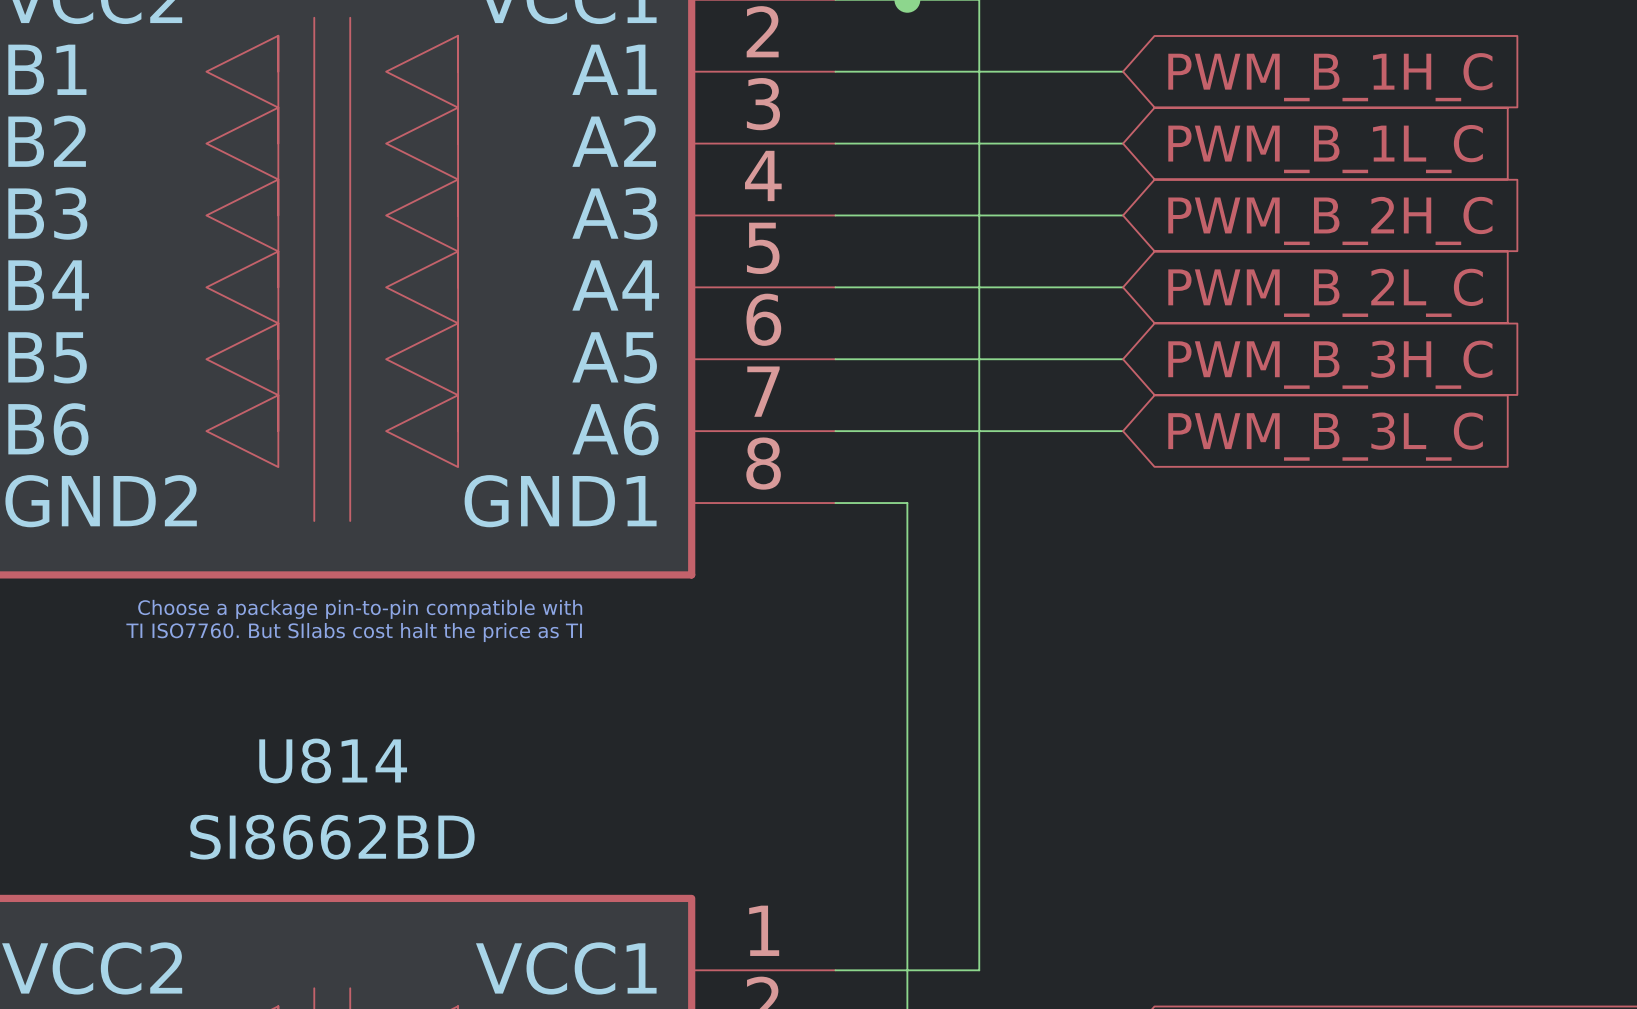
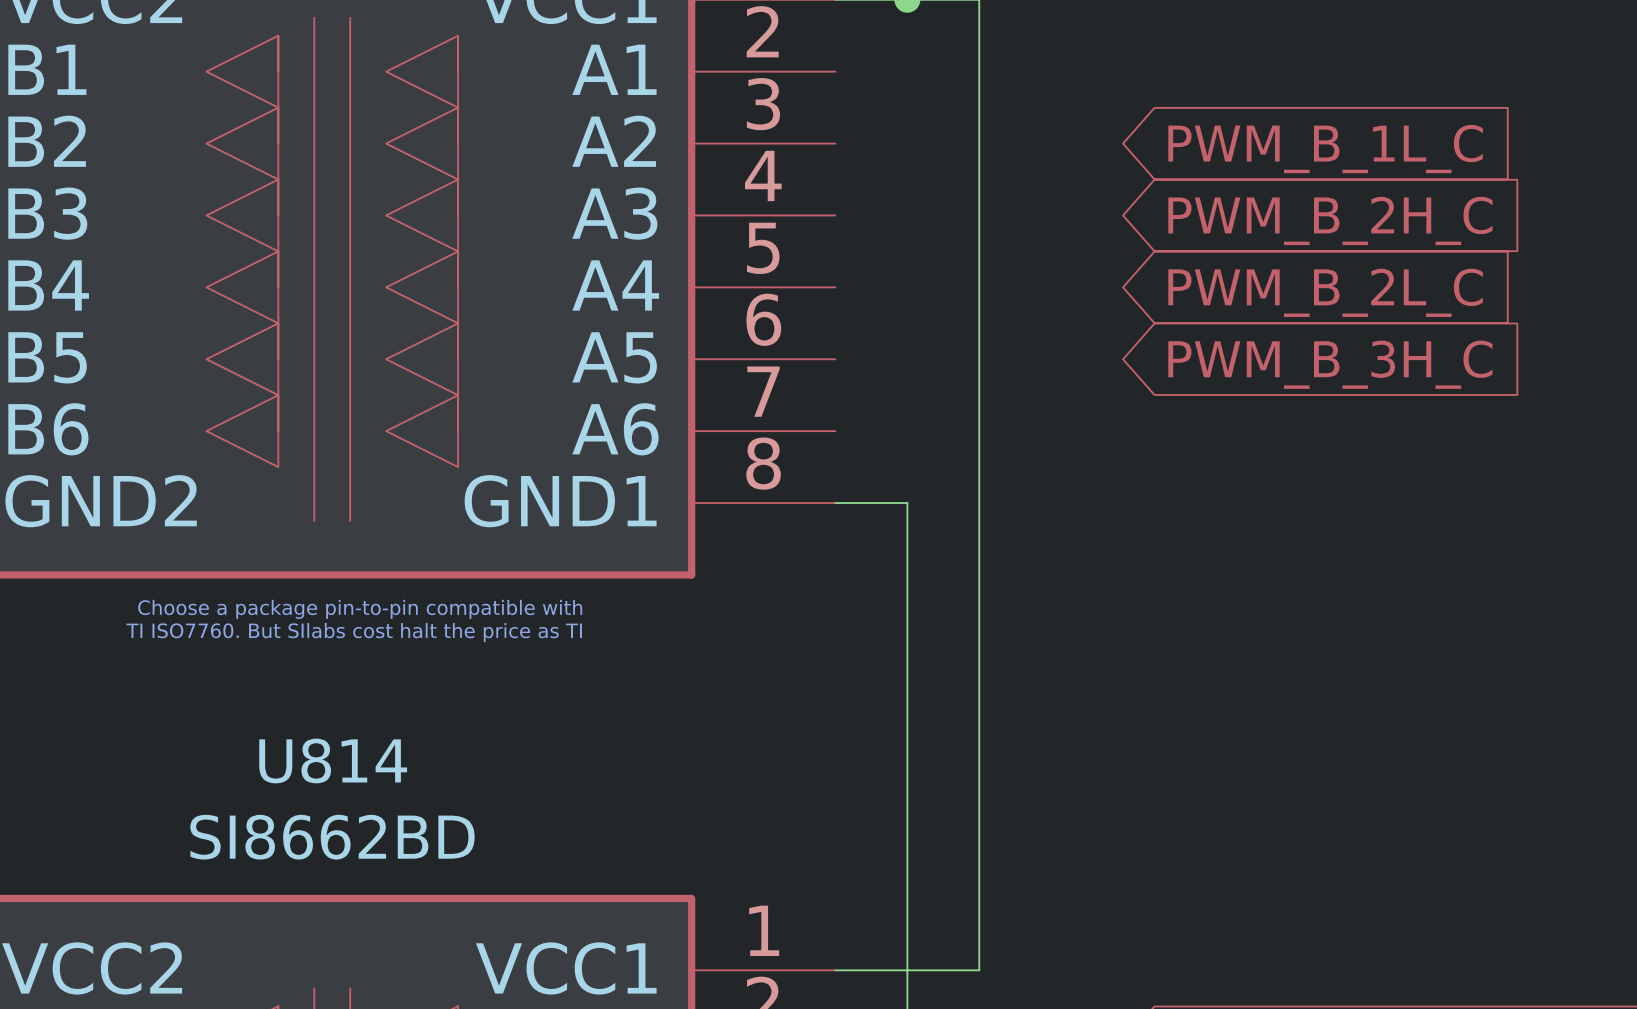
wire: (835, 71) (1123, 71) -> none
global label: PWM_B_1H_C (1330, 77) -> none
wire: (835, 143) (1123, 143) -> none
wire: (835, 215) (1123, 215) -> none
wire: (835, 287) (1123, 287) -> none
wire: (835, 359) (1123, 359) -> none
wire: (835, 431) (1123, 431) -> none
global label: PWM_B_3L_C (1325, 436) -> none

